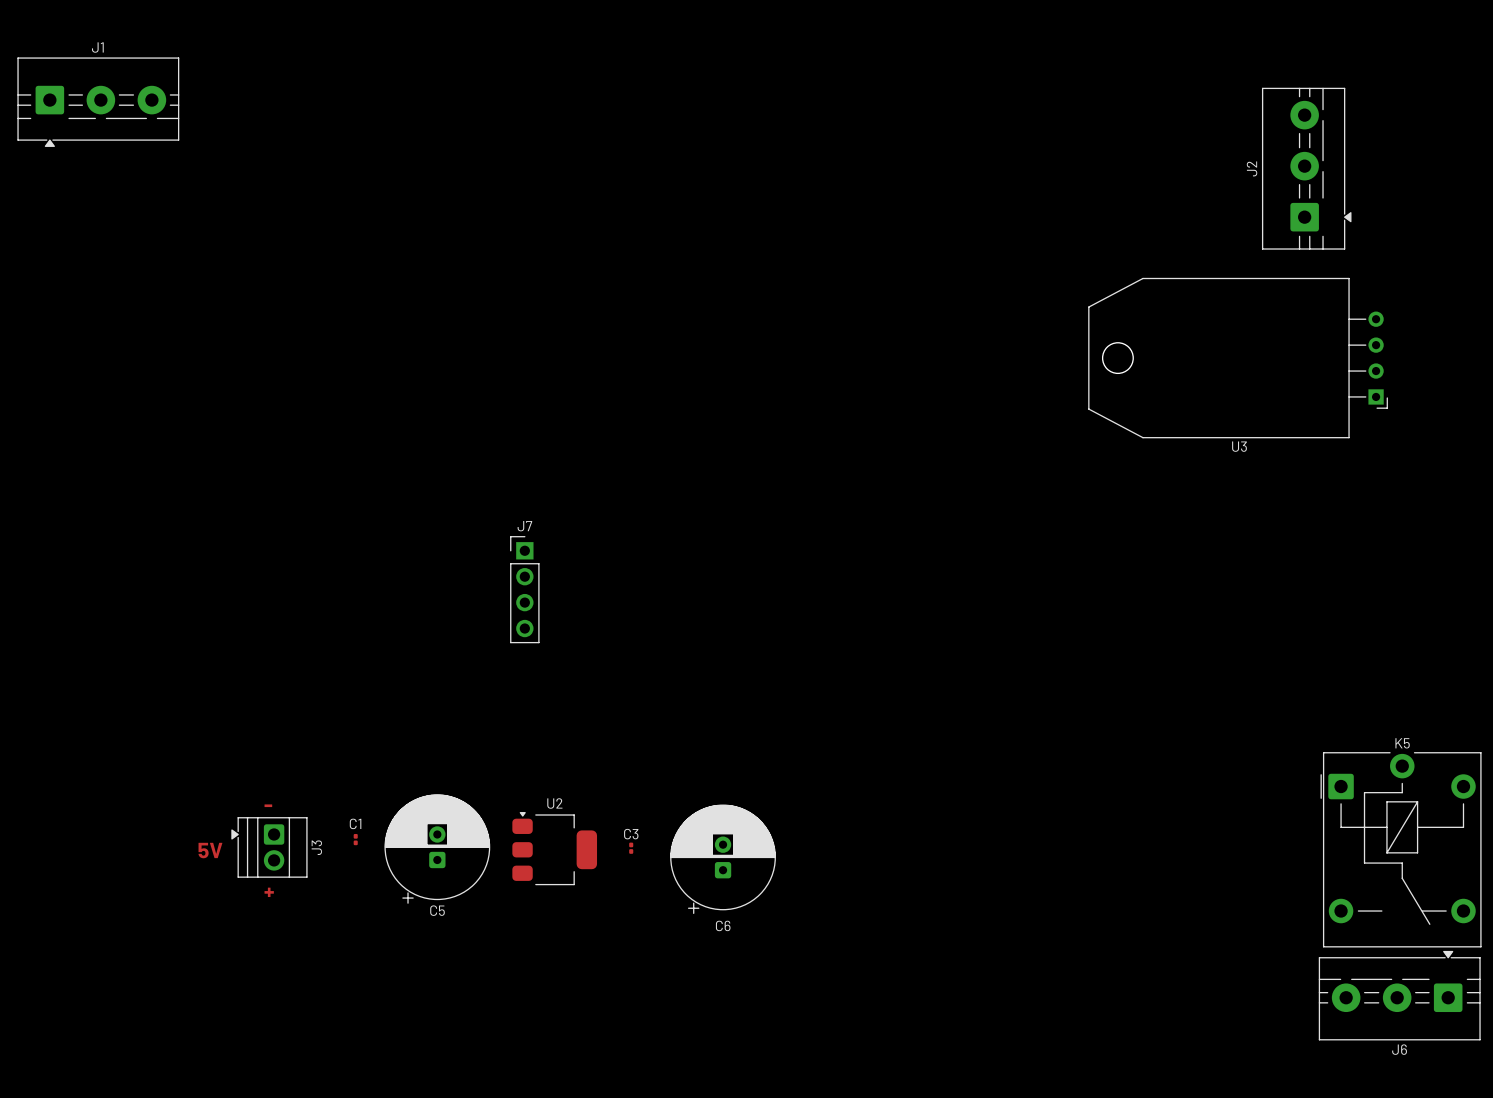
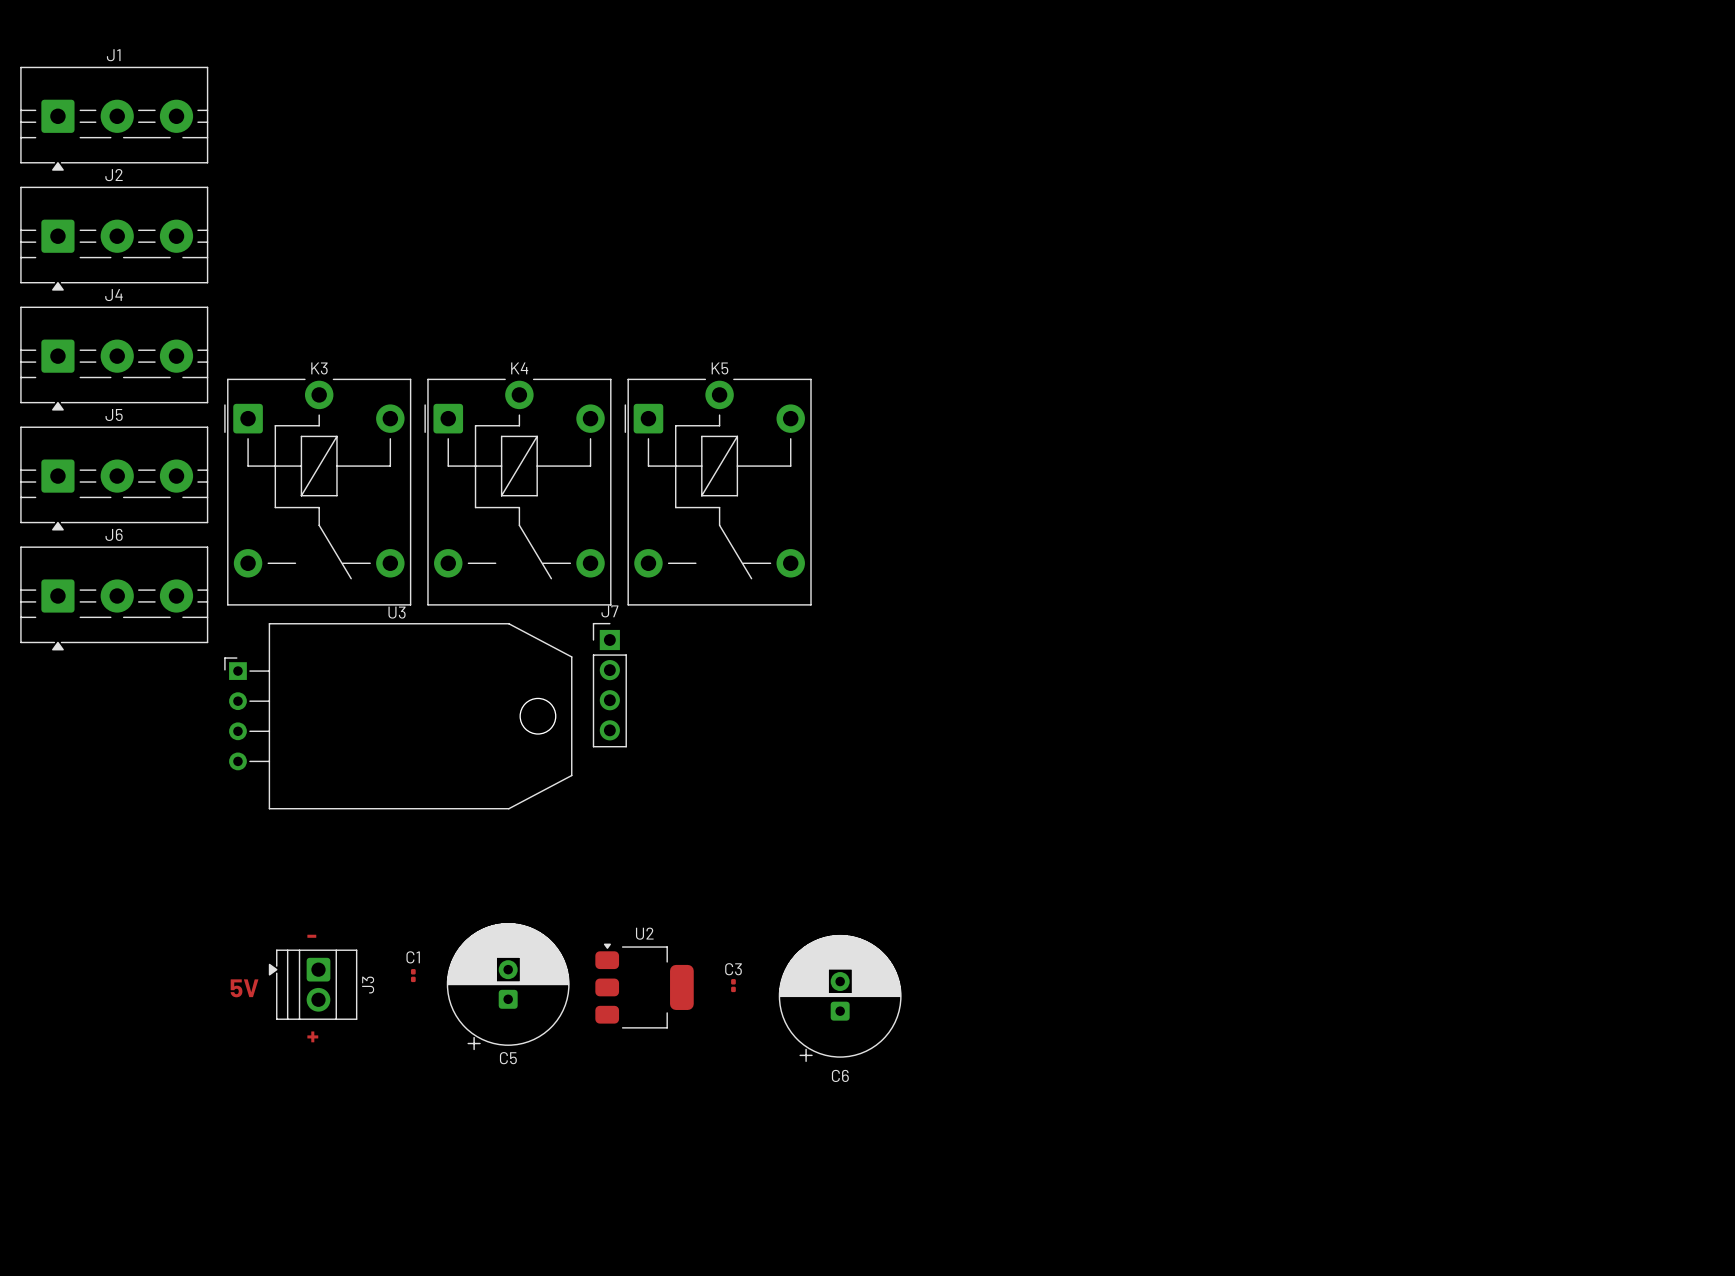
J2 rotation: 0° (1306, 168) -> 90° clockwise (114, 238)
J2 position: (1306, 168) -> (114, 238)
J4: none -> (114, 358)
U3 rotation: 0° (1238, 358) -> 180° (398, 716)
U3 position: (1238, 358) -> (398, 716)
J5: none -> (114, 478)
K3: none -> (317, 492)
K4: none -> (517, 492)
K5 position: (1401, 849) -> (718, 492)
J6 rotation: 0° (1399, 995) -> 180° (114, 598)
J6 position: (1399, 995) -> (114, 598)

